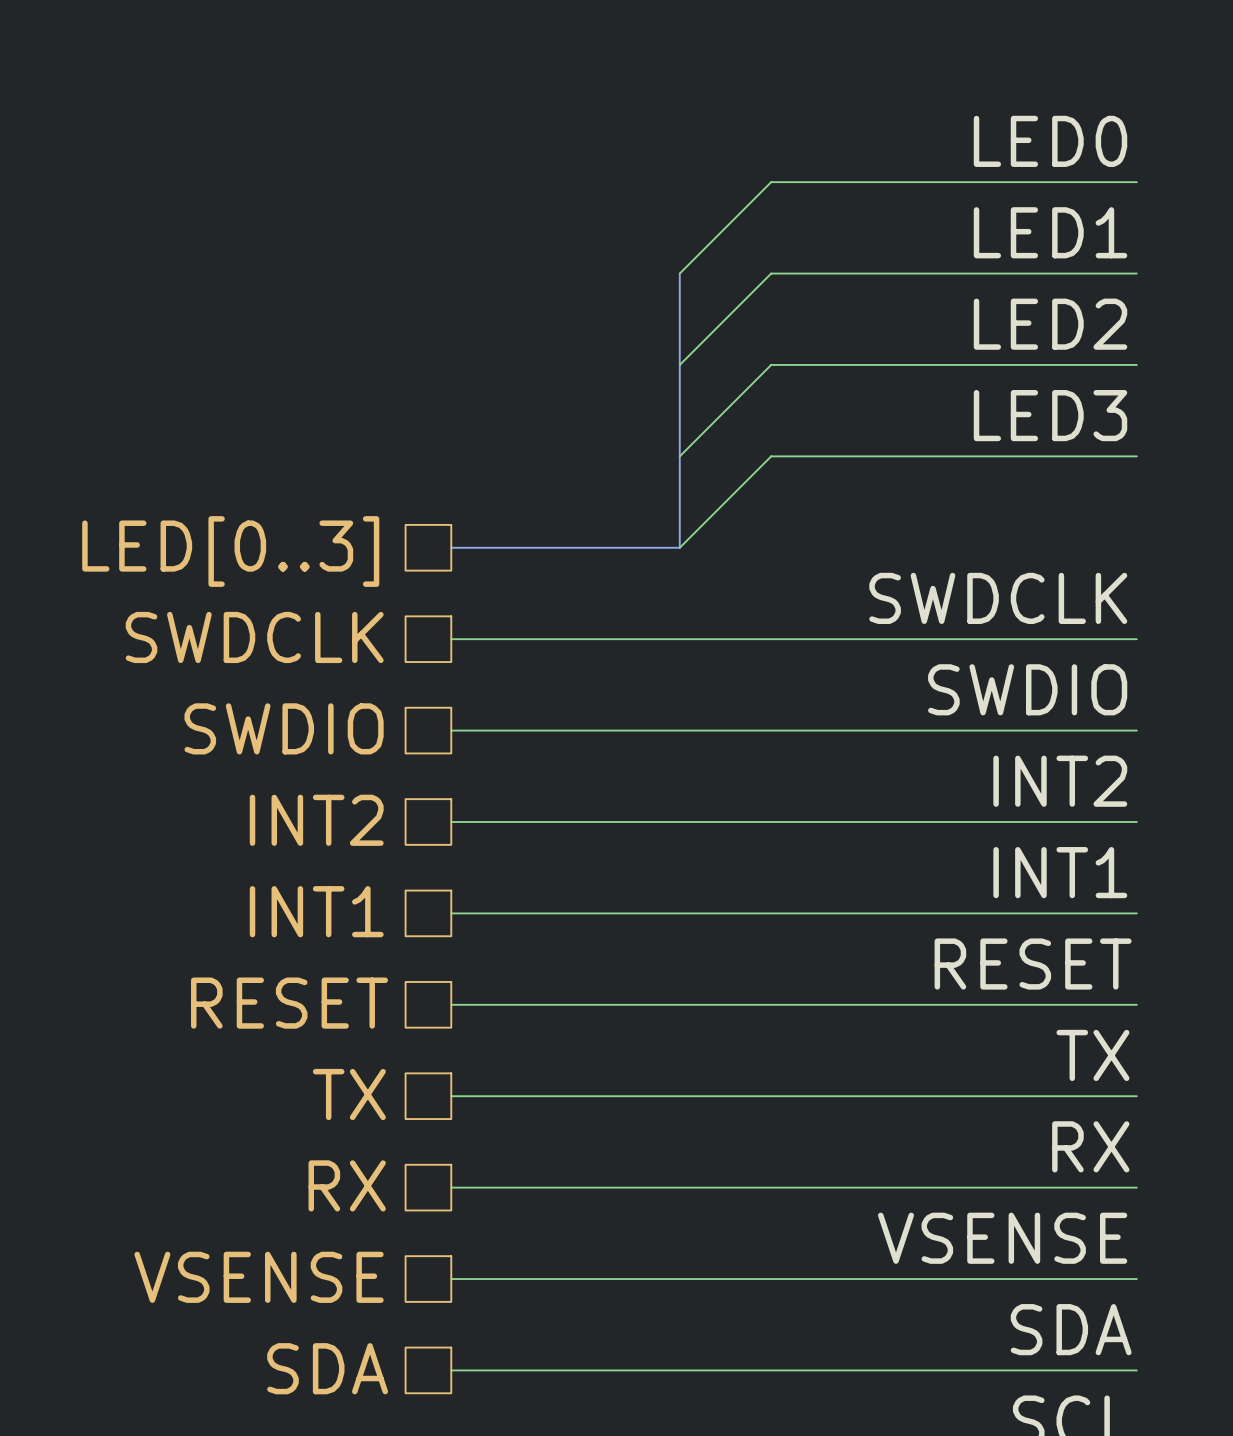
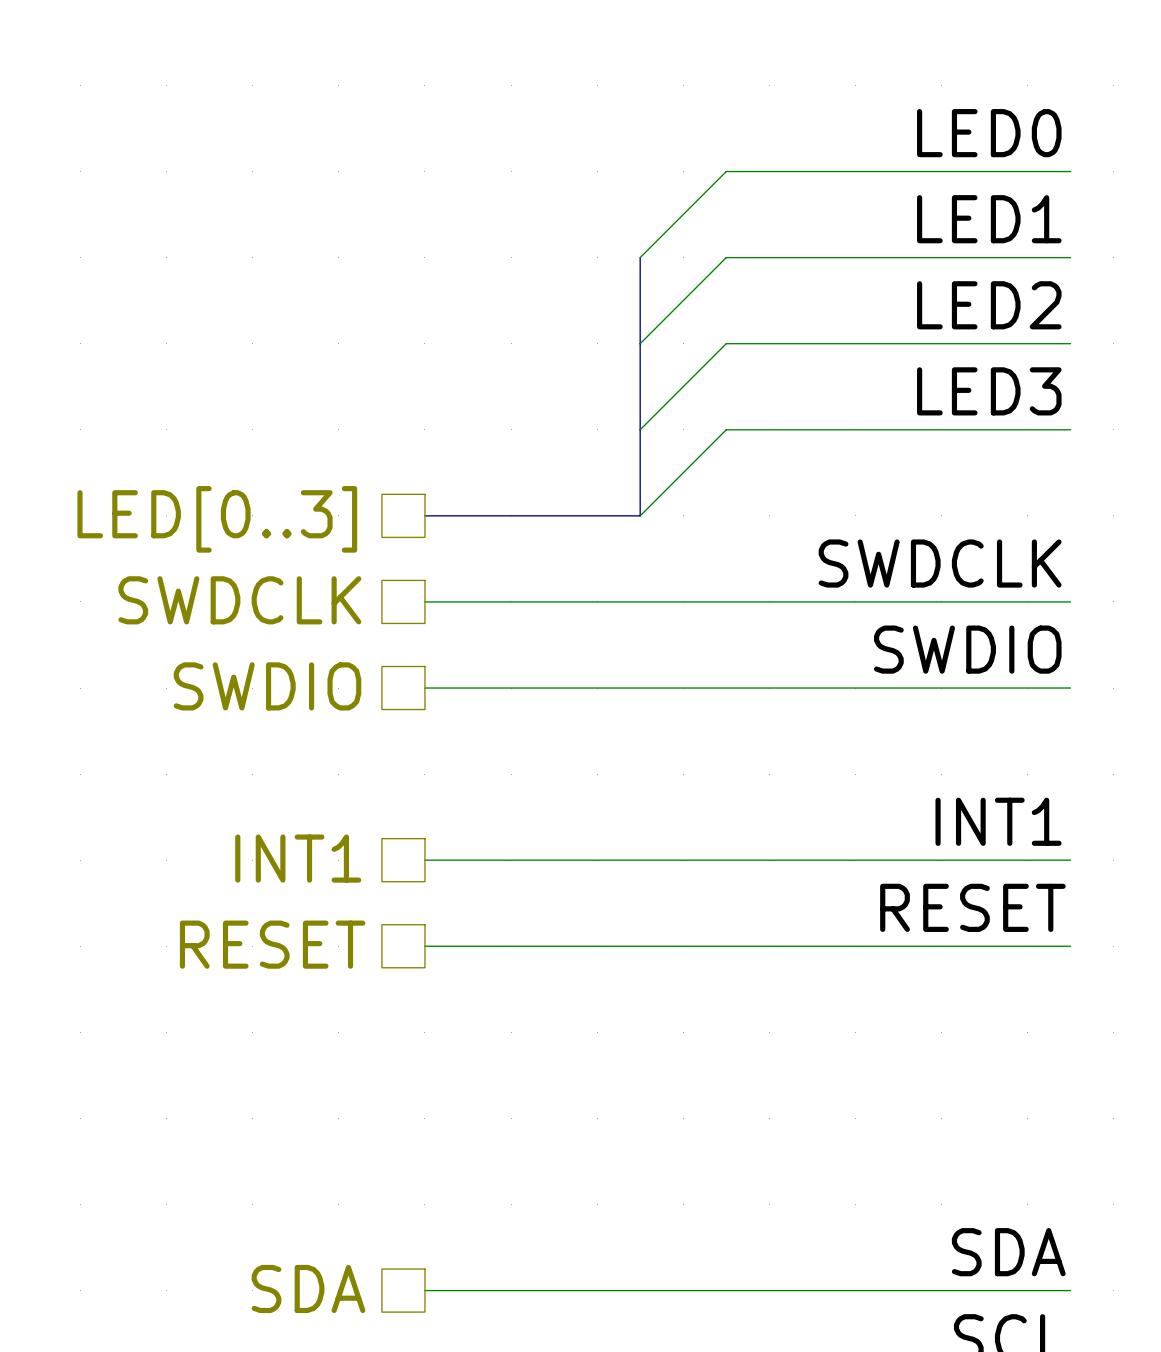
label: INT2 (1060, 781) -> none
hierarchical label: INT2 (316, 820) -> none
wire: (451, 821) (1136, 821) -> none
label: TX (1092, 1055) -> none
hierarchical label: TX (349, 1094) -> none
wire: (451, 1096) (1136, 1096) -> none
label: RX (1090, 1146) -> none
hierarchical label: RX (347, 1185) -> none
wire: (451, 1187) (1136, 1187) -> none
label: VSENSE (1002, 1238) -> none
hierarchical label: VSENSE (259, 1277) -> none
wire: (451, 1279) (1136, 1279) -> none

